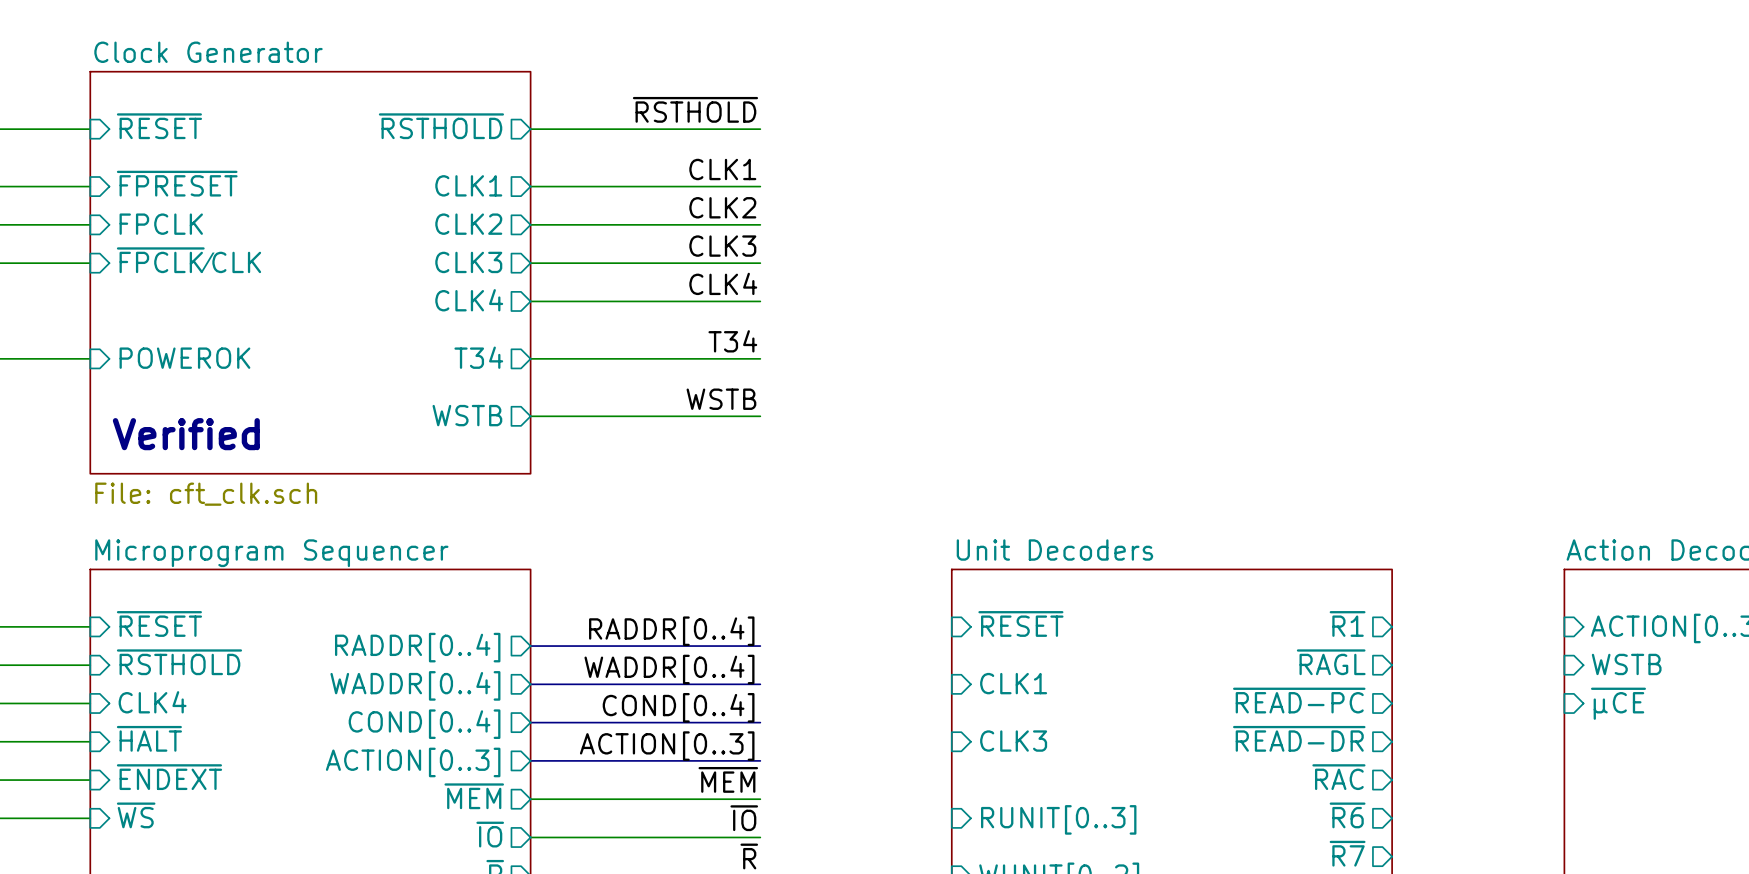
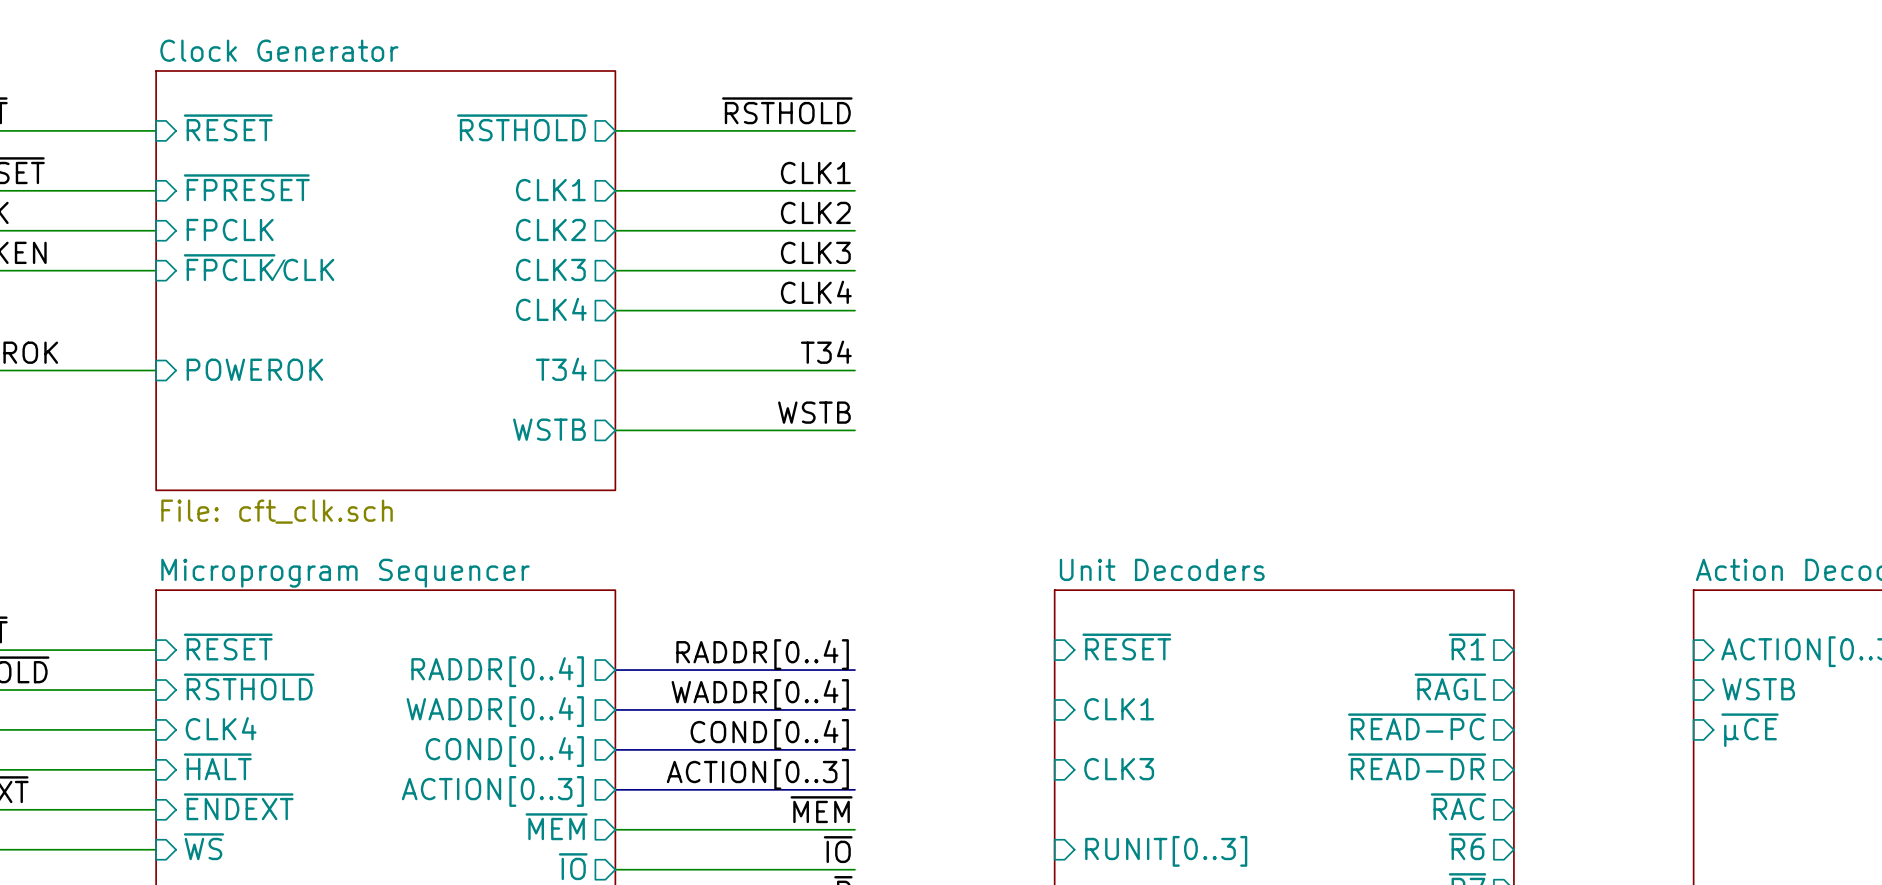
text: Verified (186, 434) -> none

